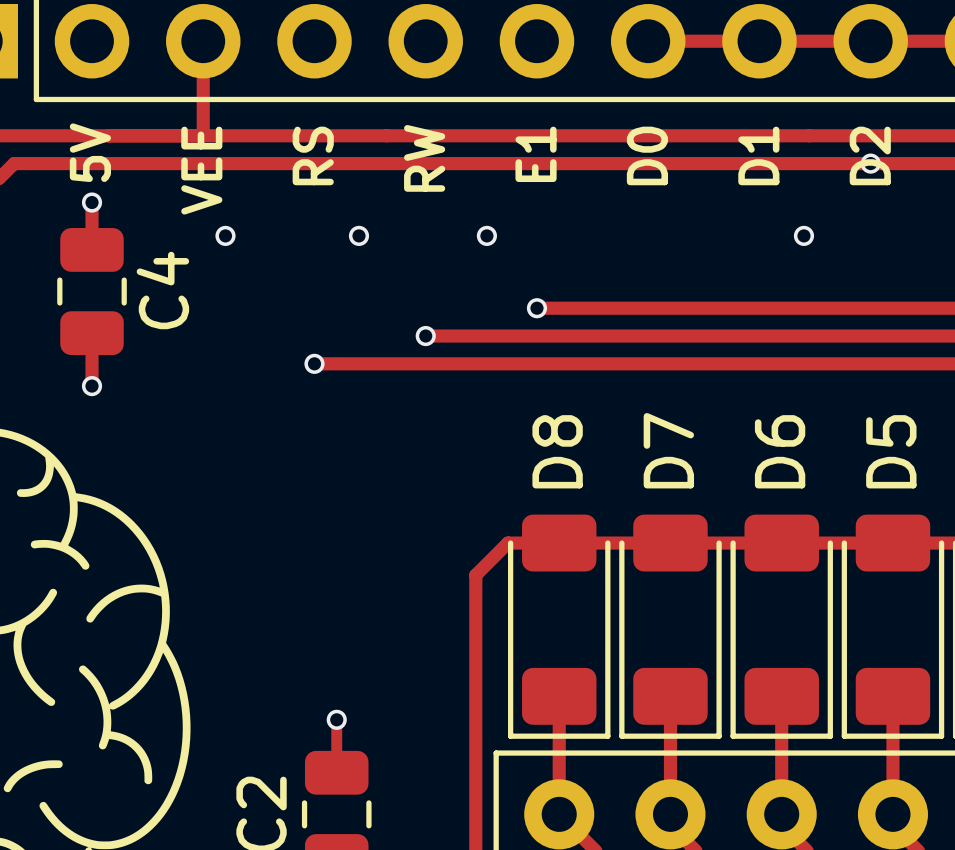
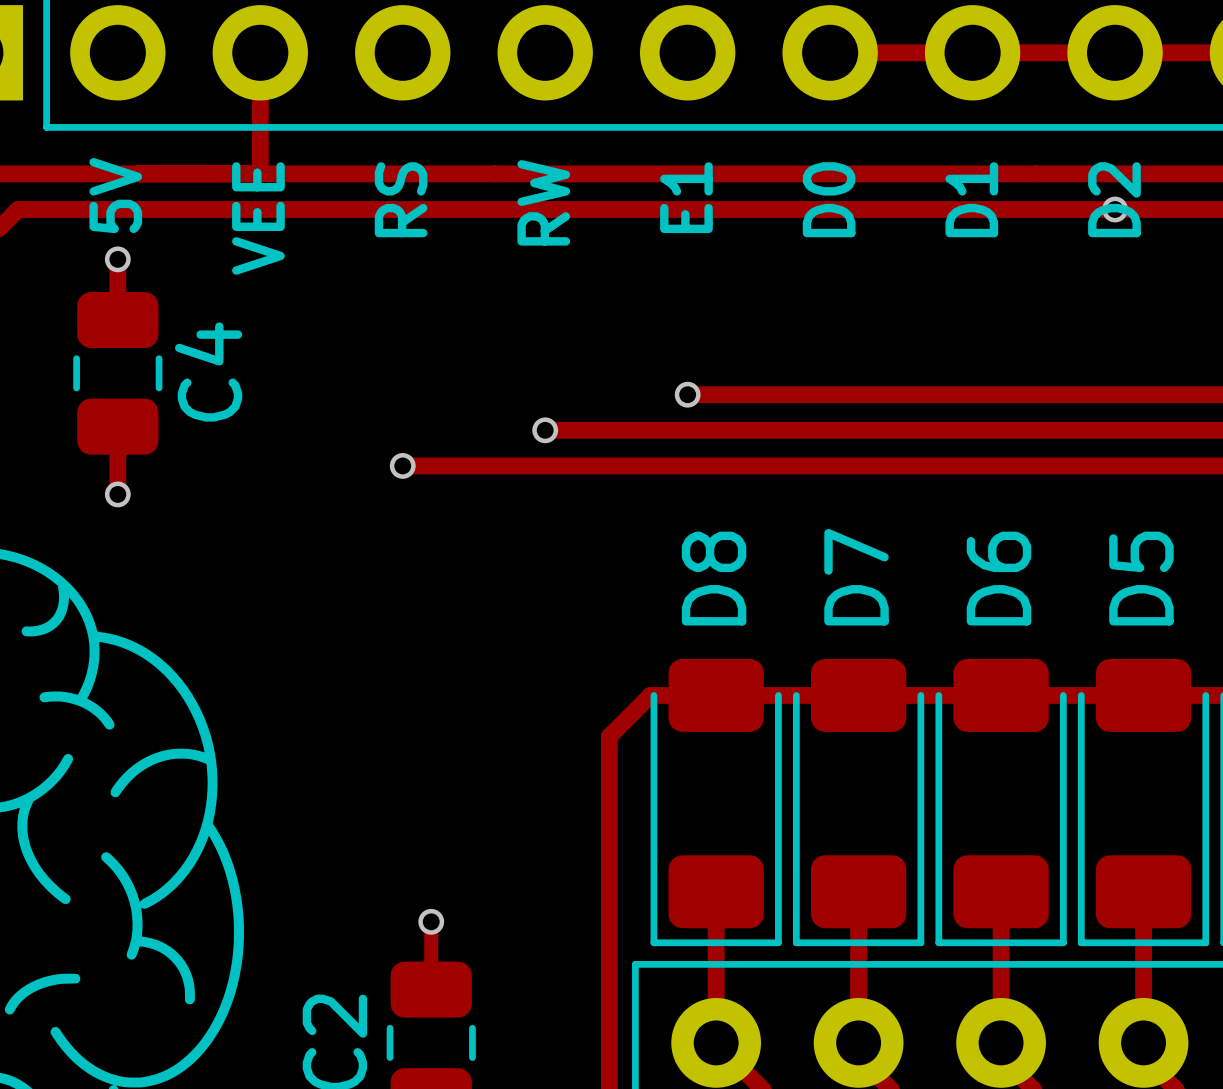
via: (225, 235) -> none
via: (358, 235) -> none
via: (486, 235) -> none
via: (803, 235) -> none

